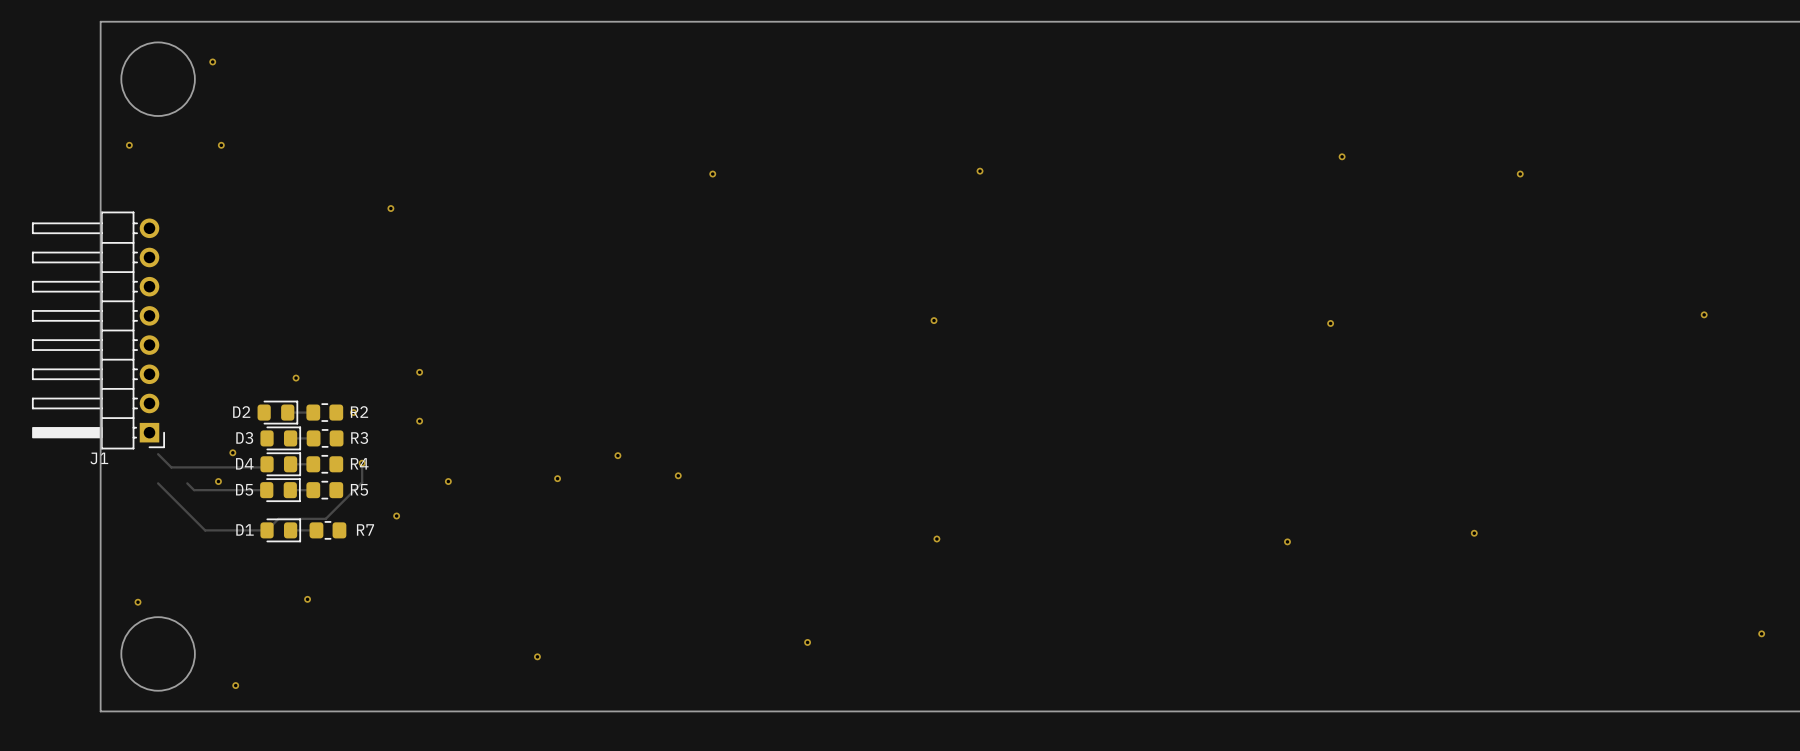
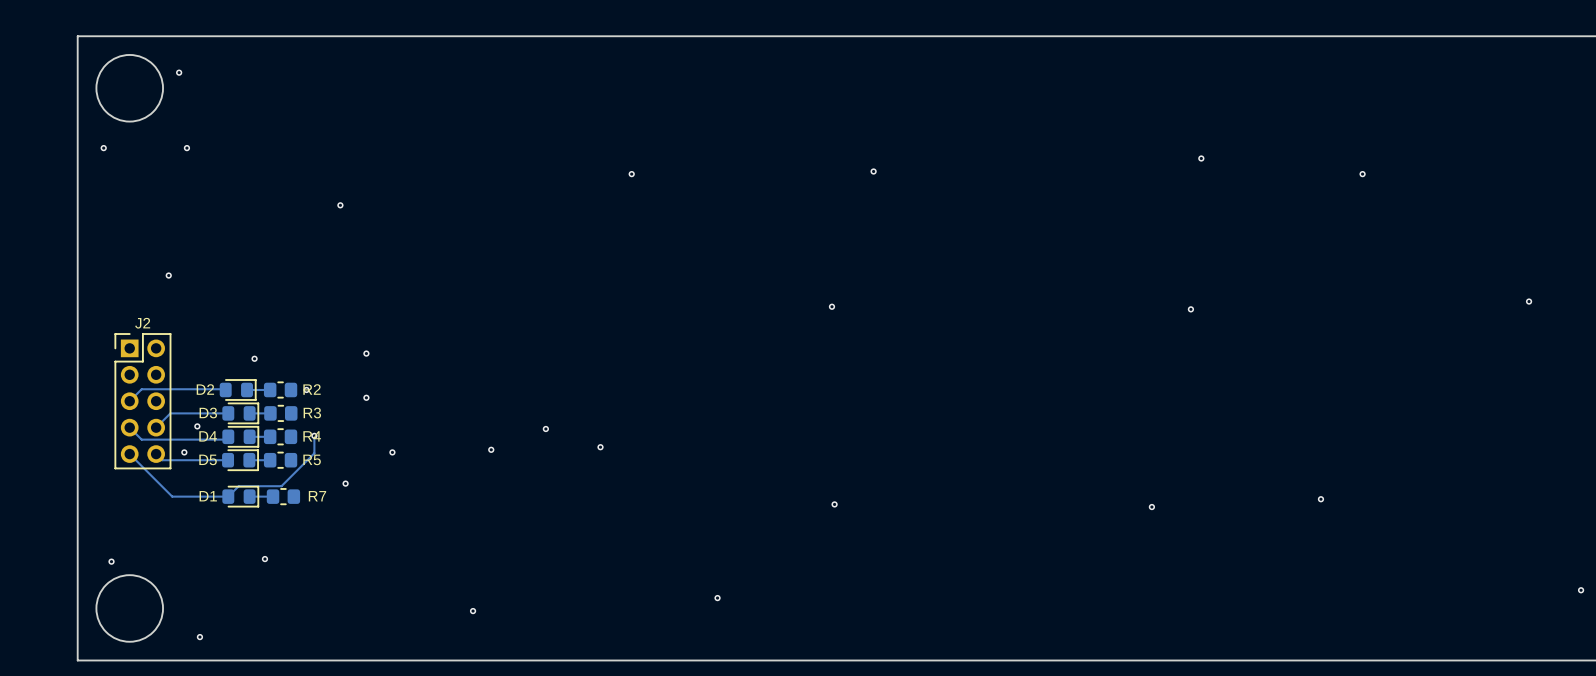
via: none -> (168, 275)
J1: (98, 330) -> none
track: none -> (224, 389) (141, 389) (129, 401)
J2: none -> (142, 401)
track: none -> (228, 413) (170, 413) (156, 427)

